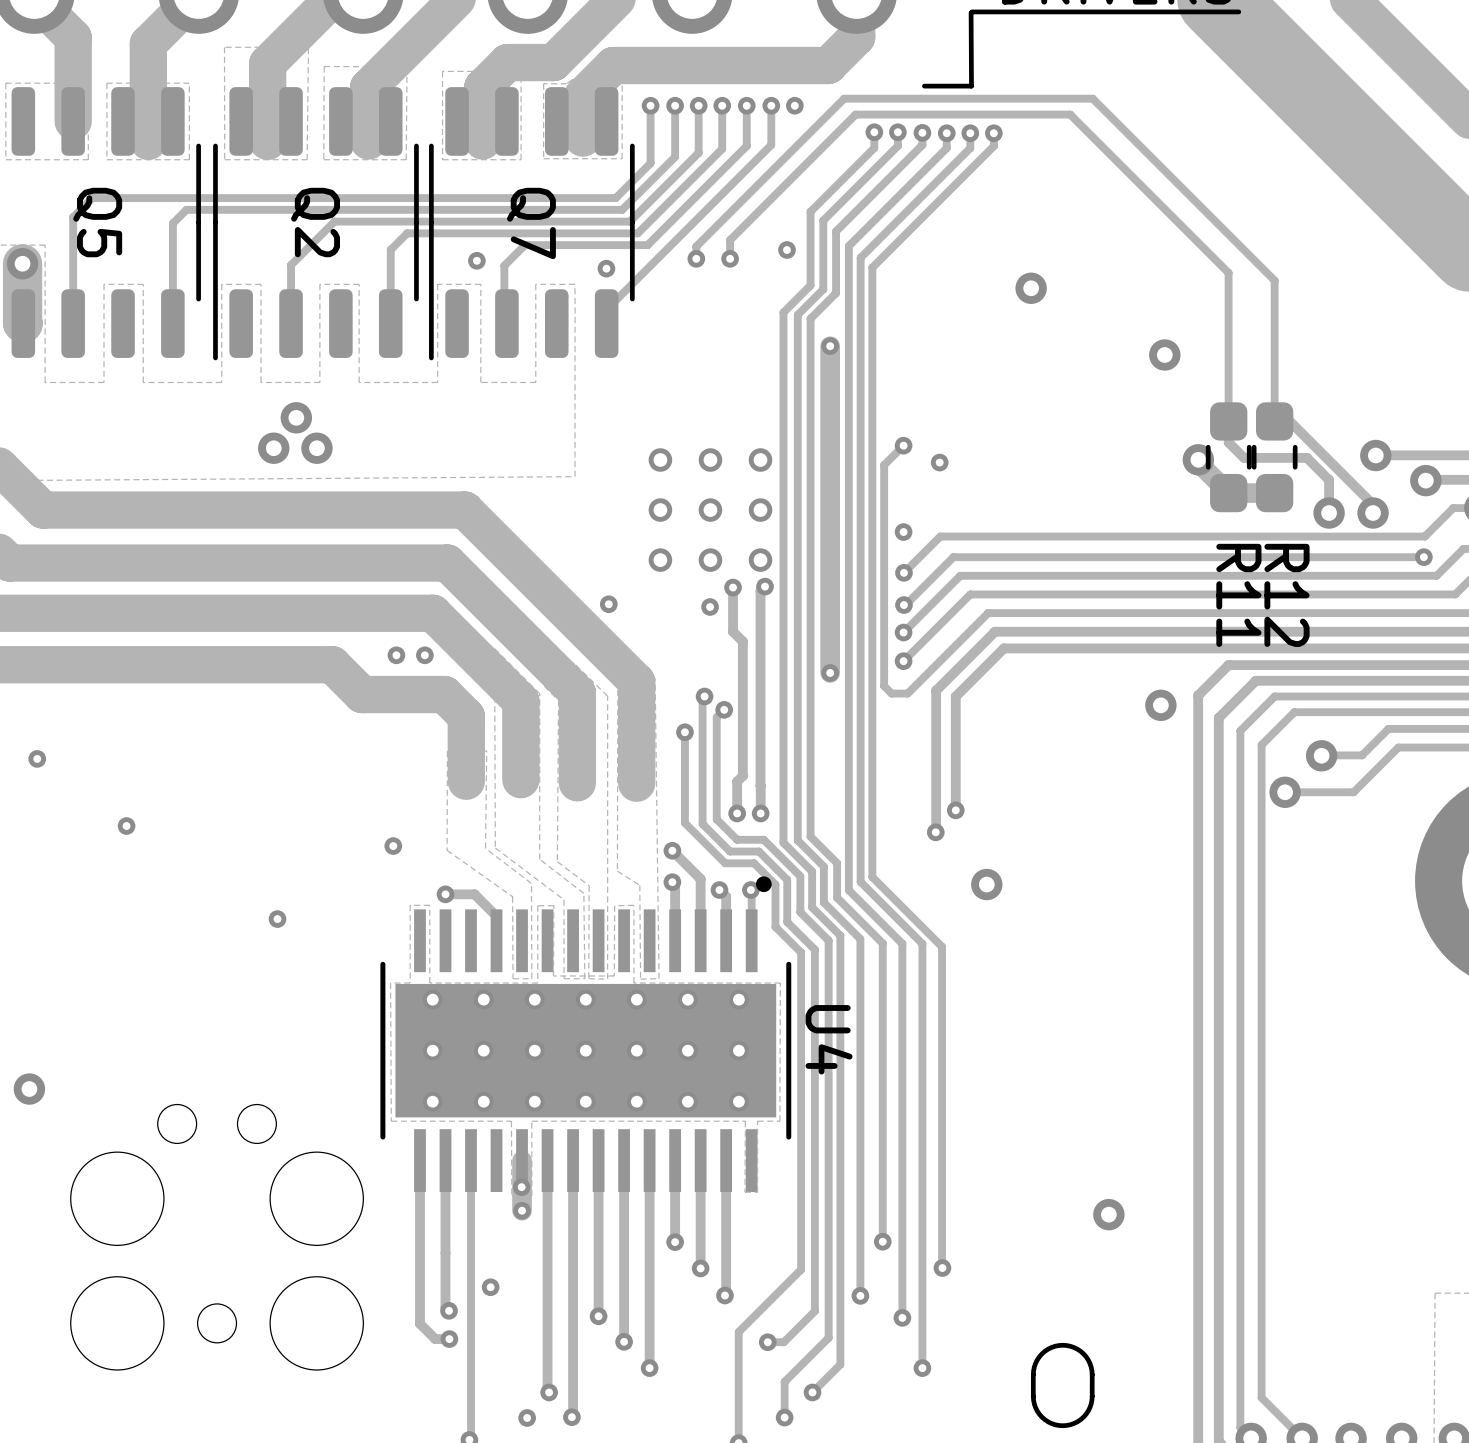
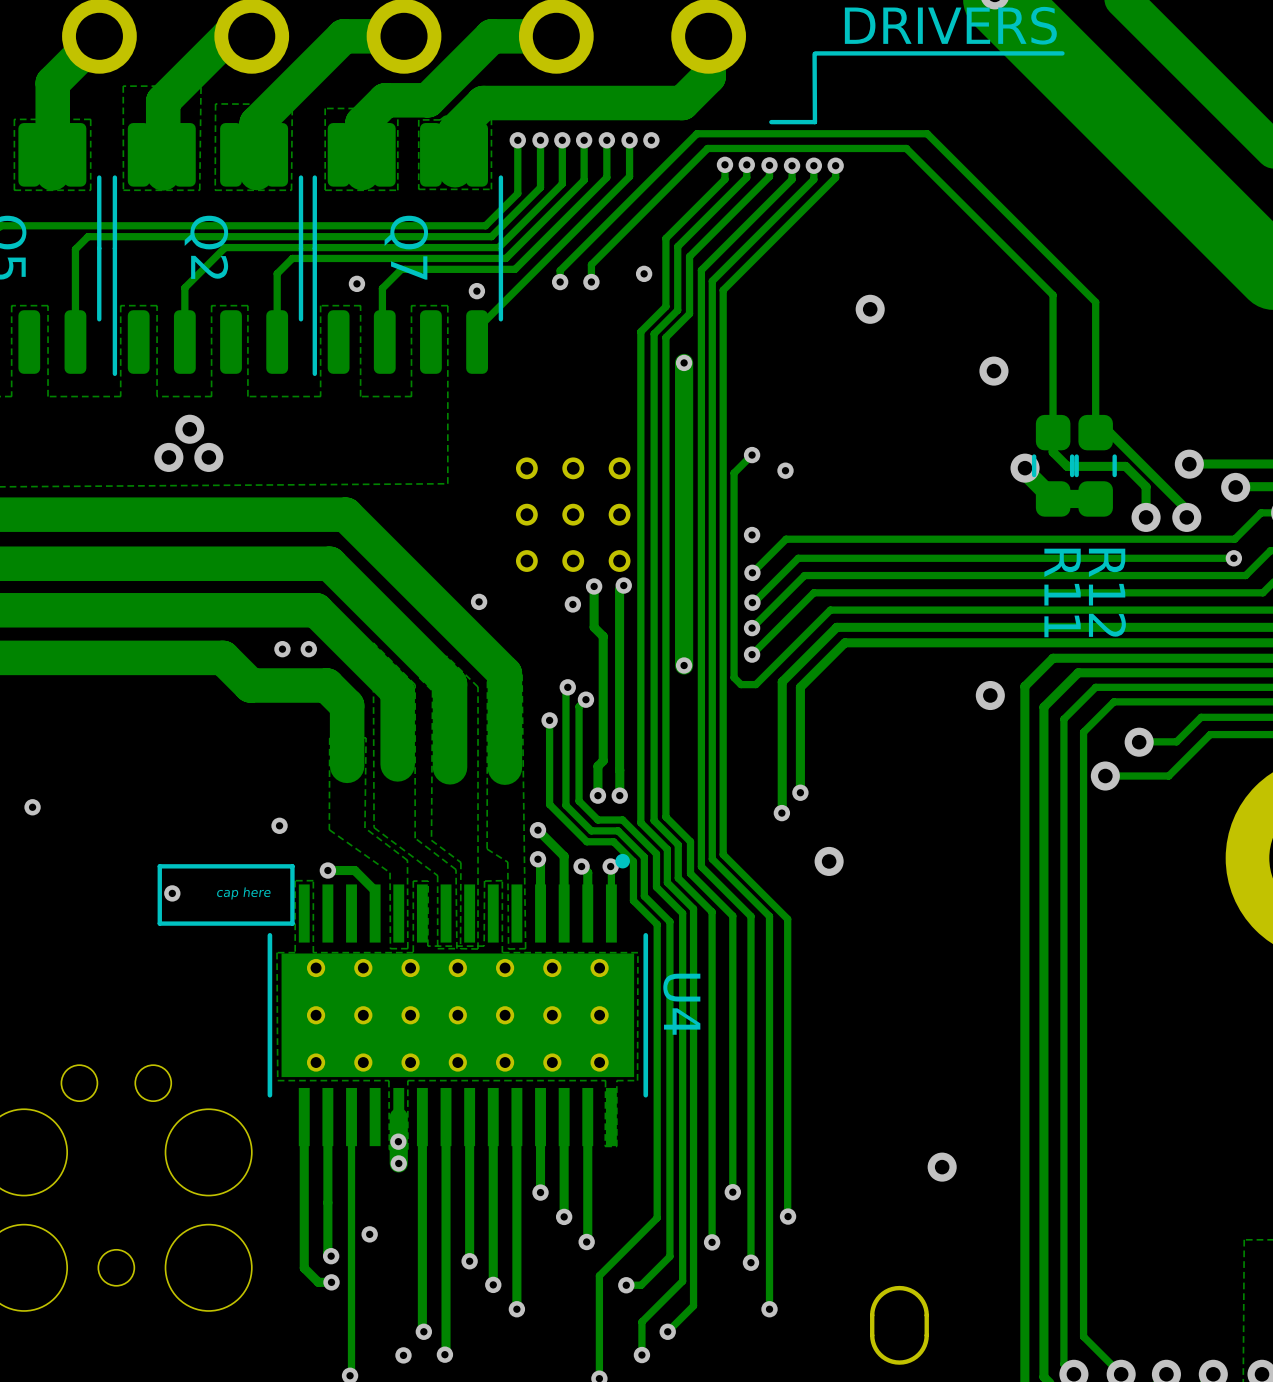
line: none -> (292, 866) (159, 866) (159, 923) (292, 923) (292, 866)
text: none -> cap here (243, 893)

